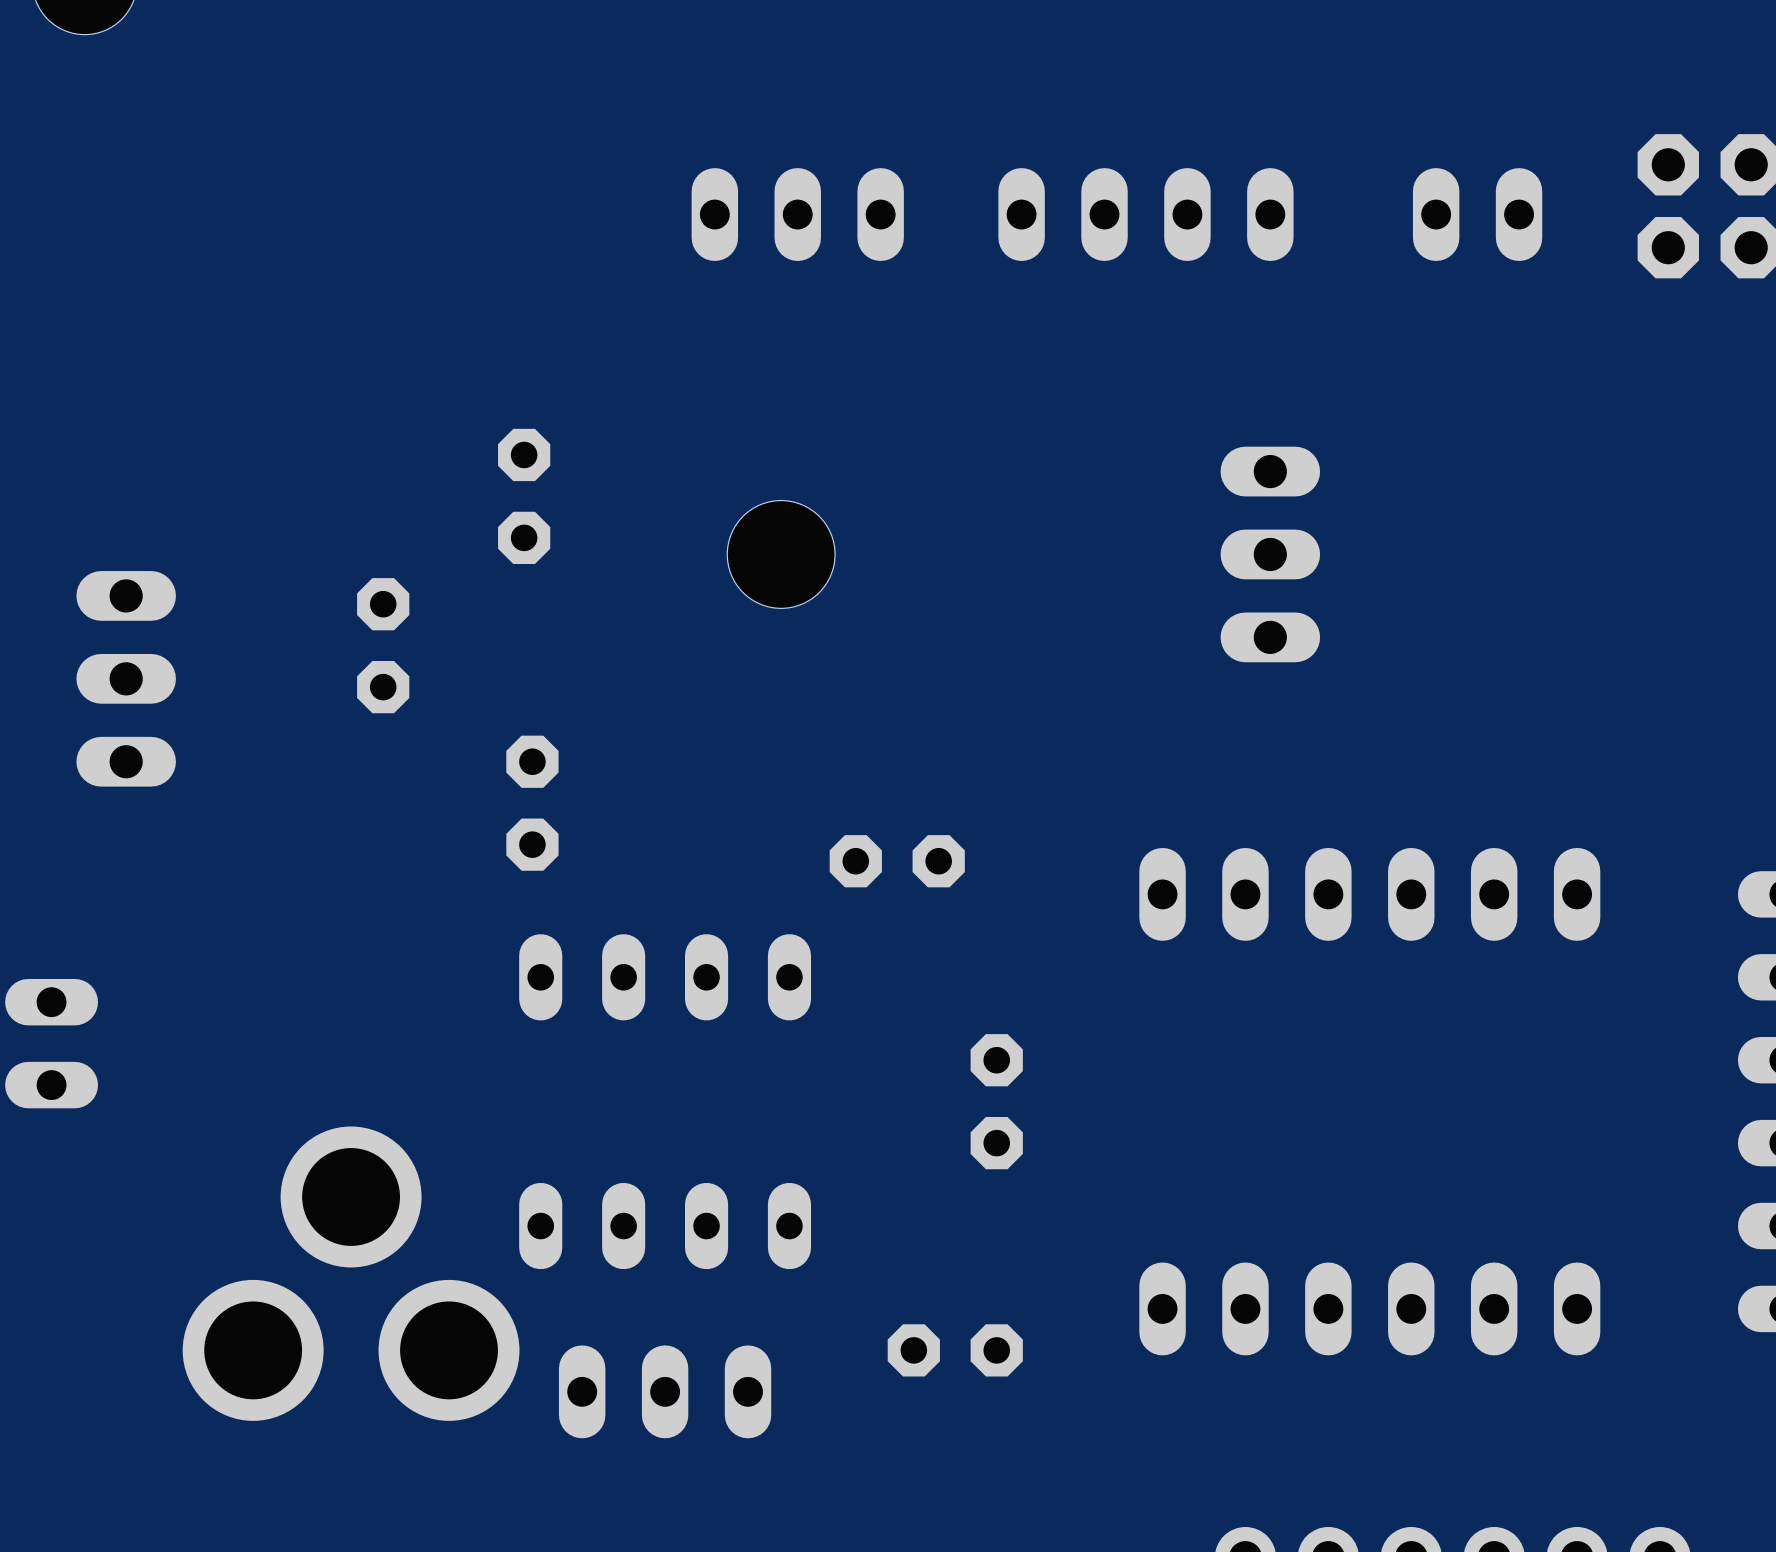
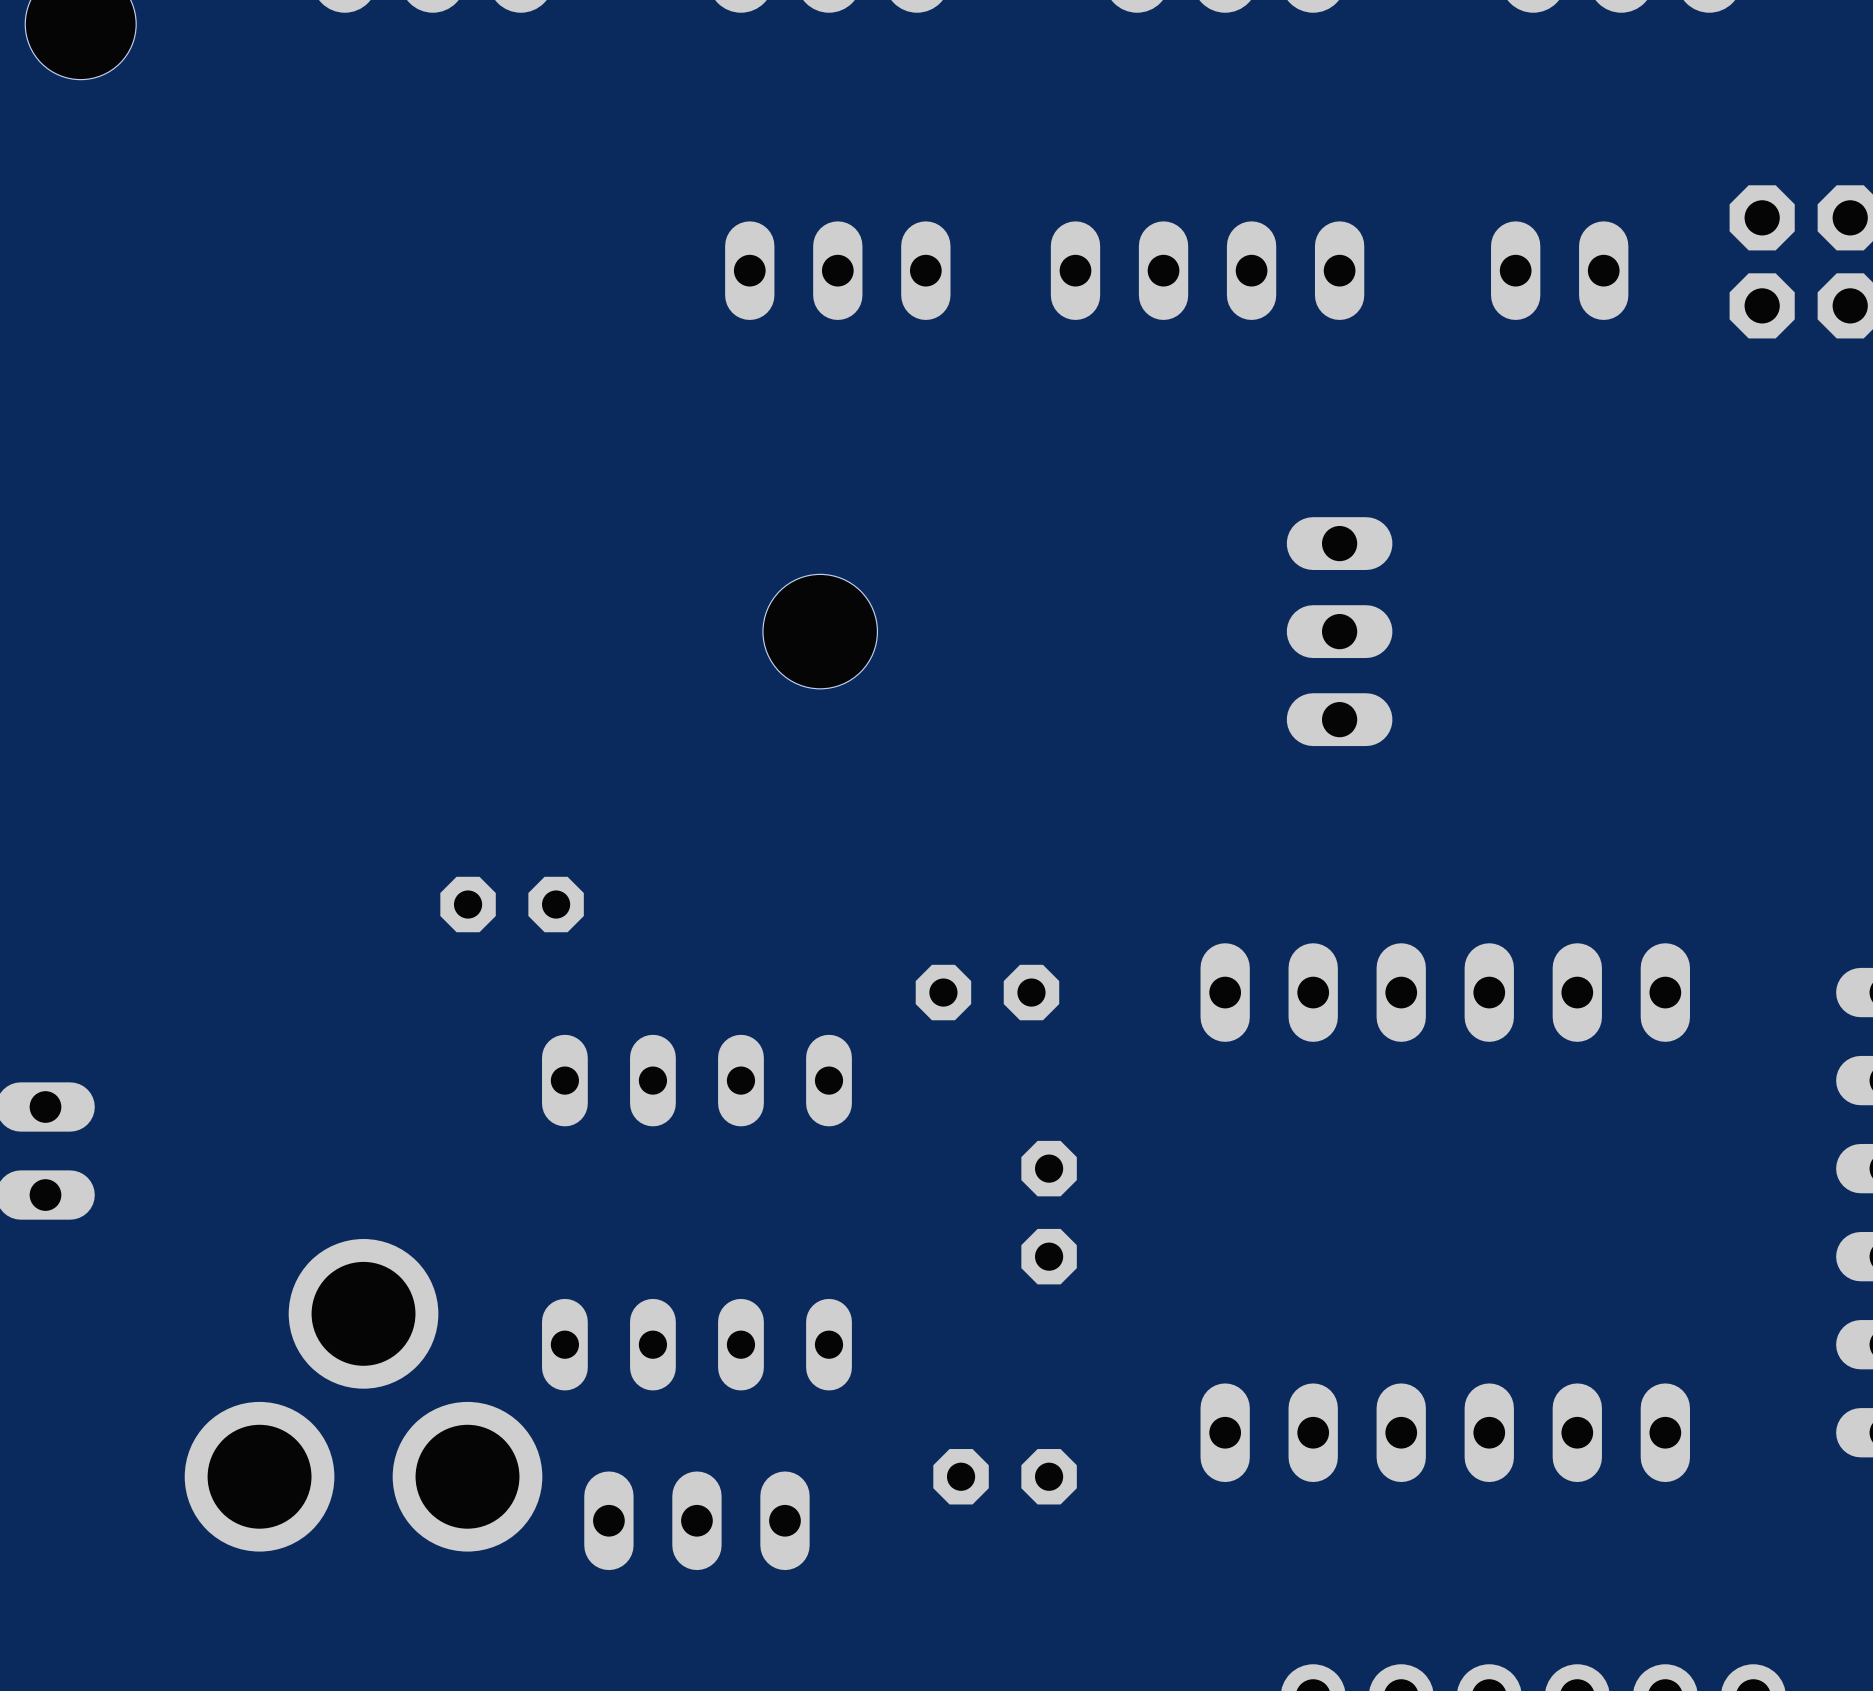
part: (524, 496) -> none
part: (383, 645) -> none
part: (126, 678) -> none
part rotation: 0° (532, 803) -> 90° clockwise (512, 904)
part position: (897, 861) -> (987, 992)

